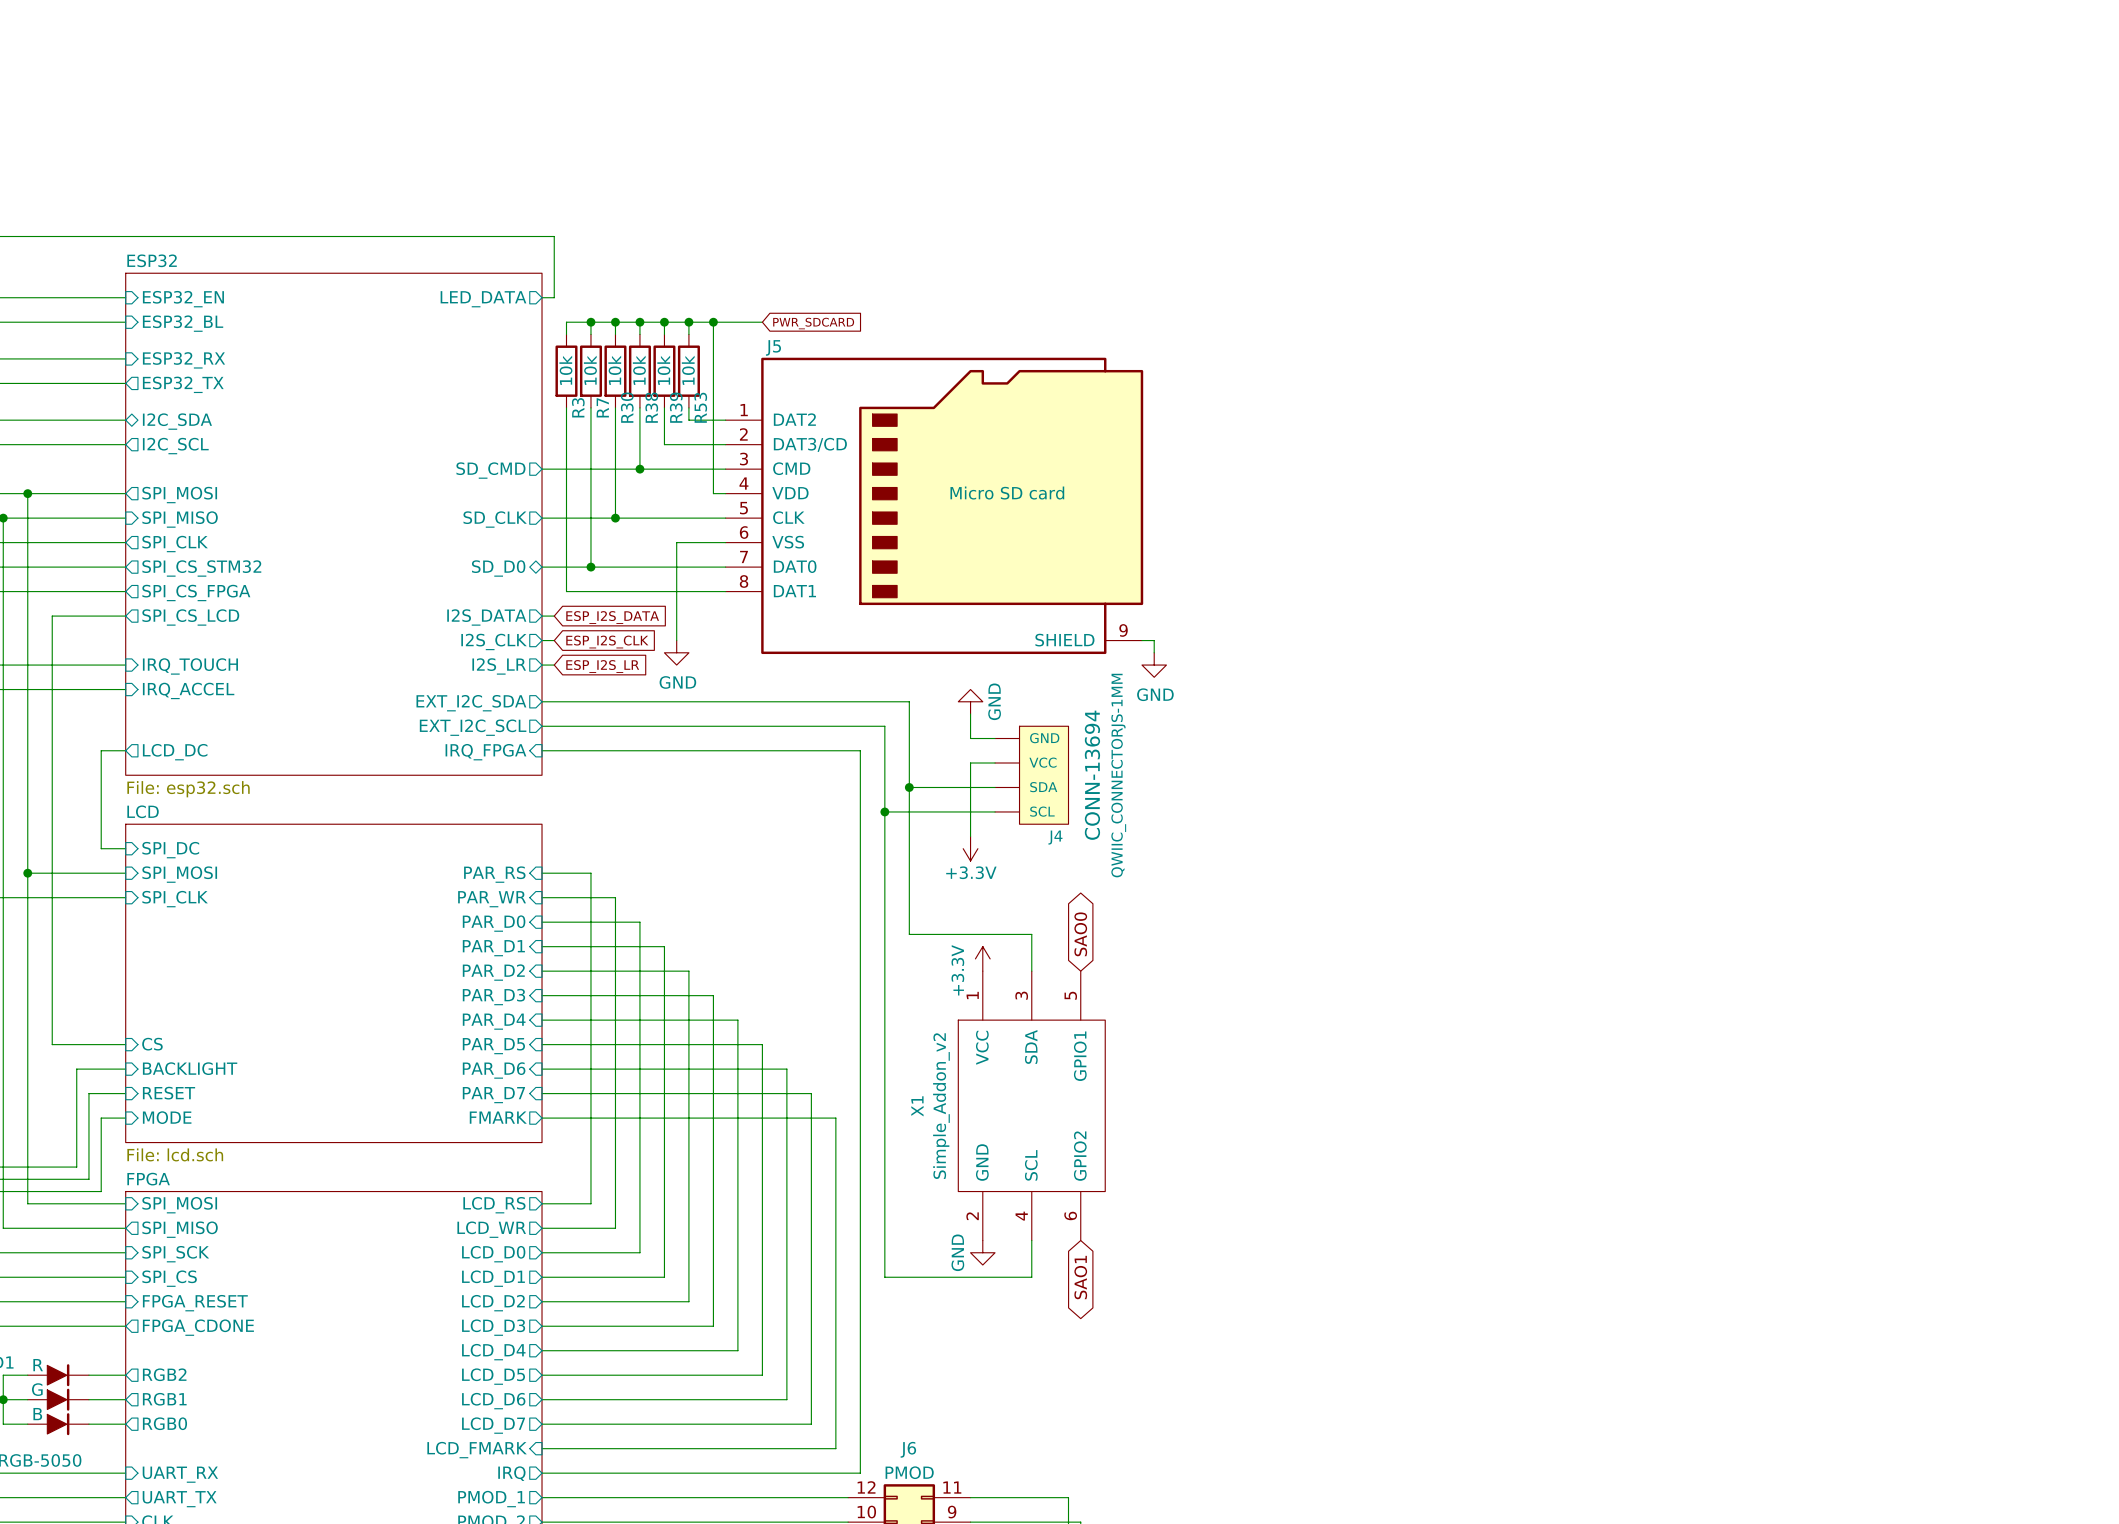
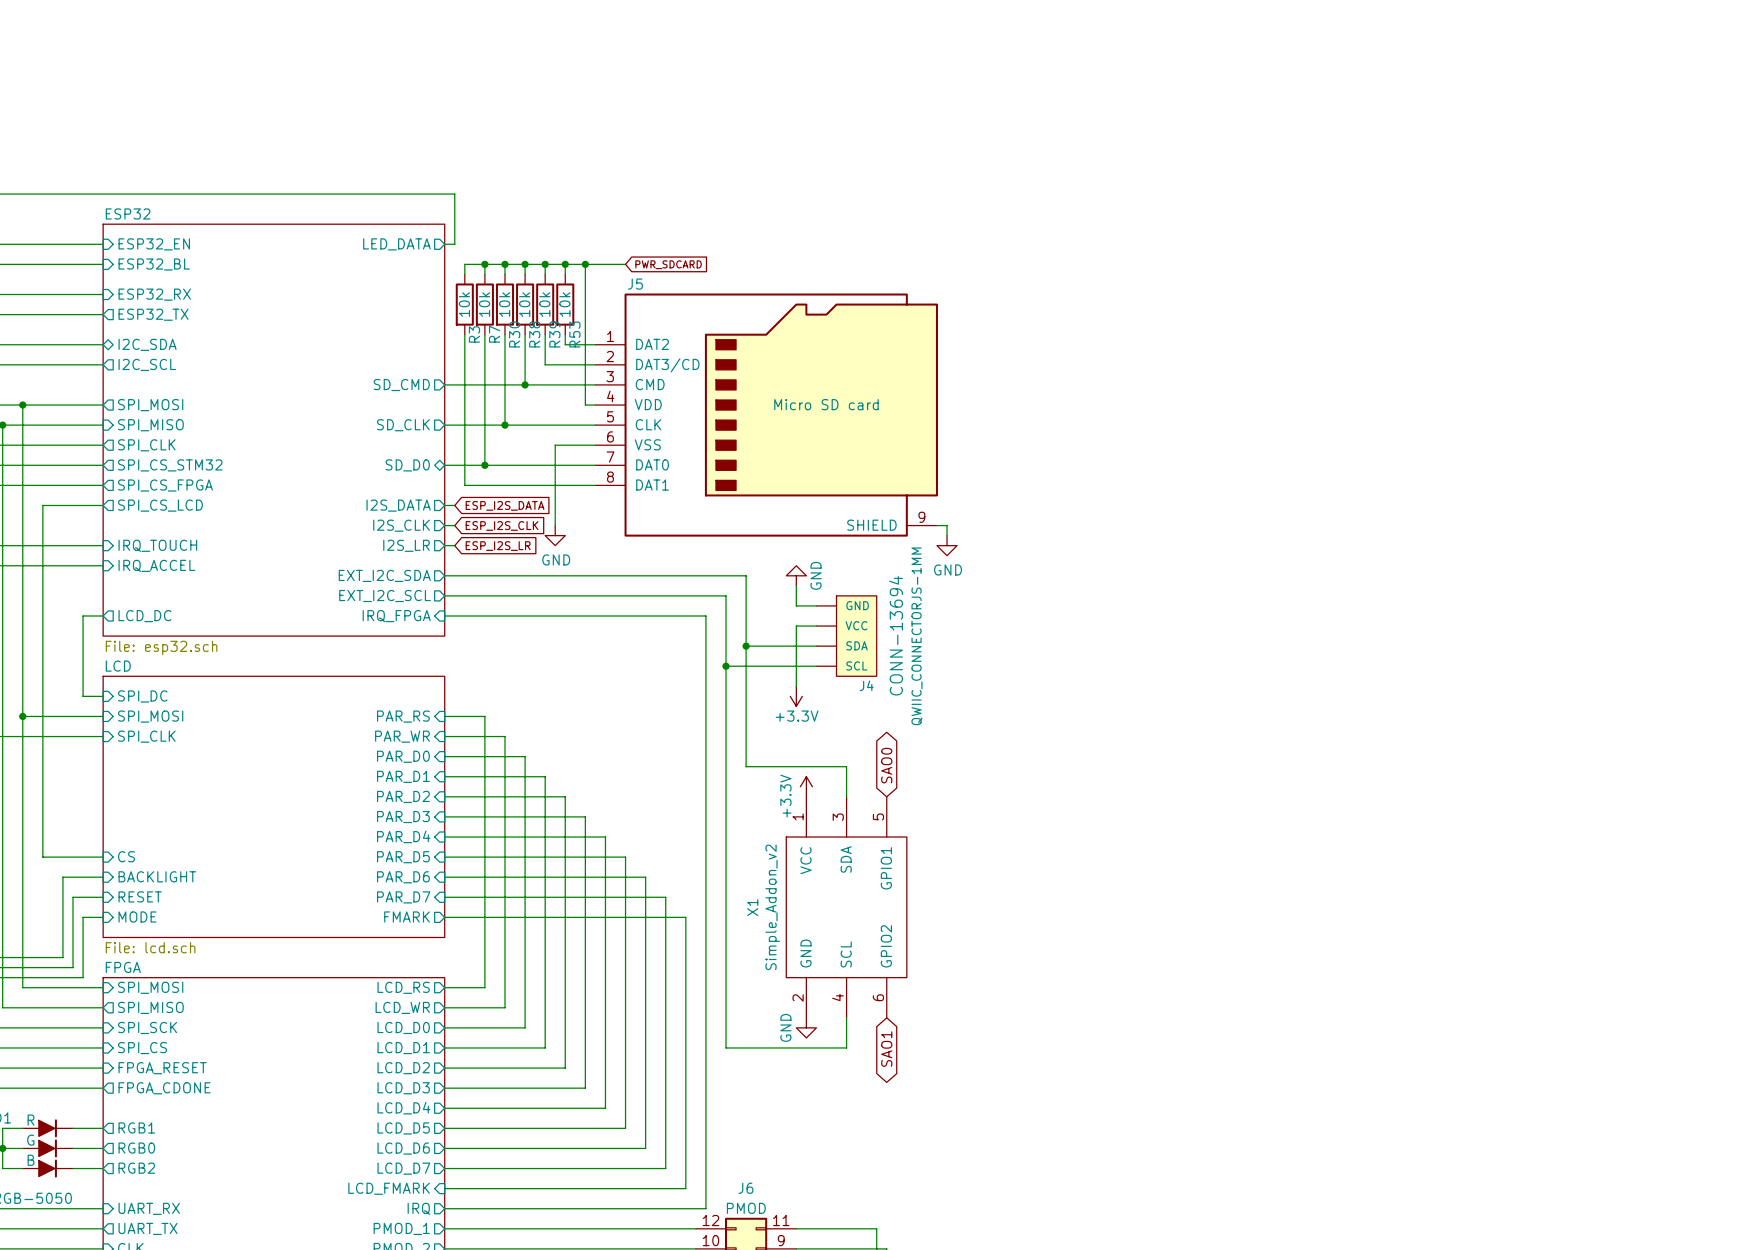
sheet pin: RGB2 (164, 1374) -> RGB1 (136, 1127)
sheet pin: RGB1 (164, 1399) -> RGB0 (136, 1148)
sheet pin: RGB0 (164, 1423) -> RGB2 (136, 1168)

